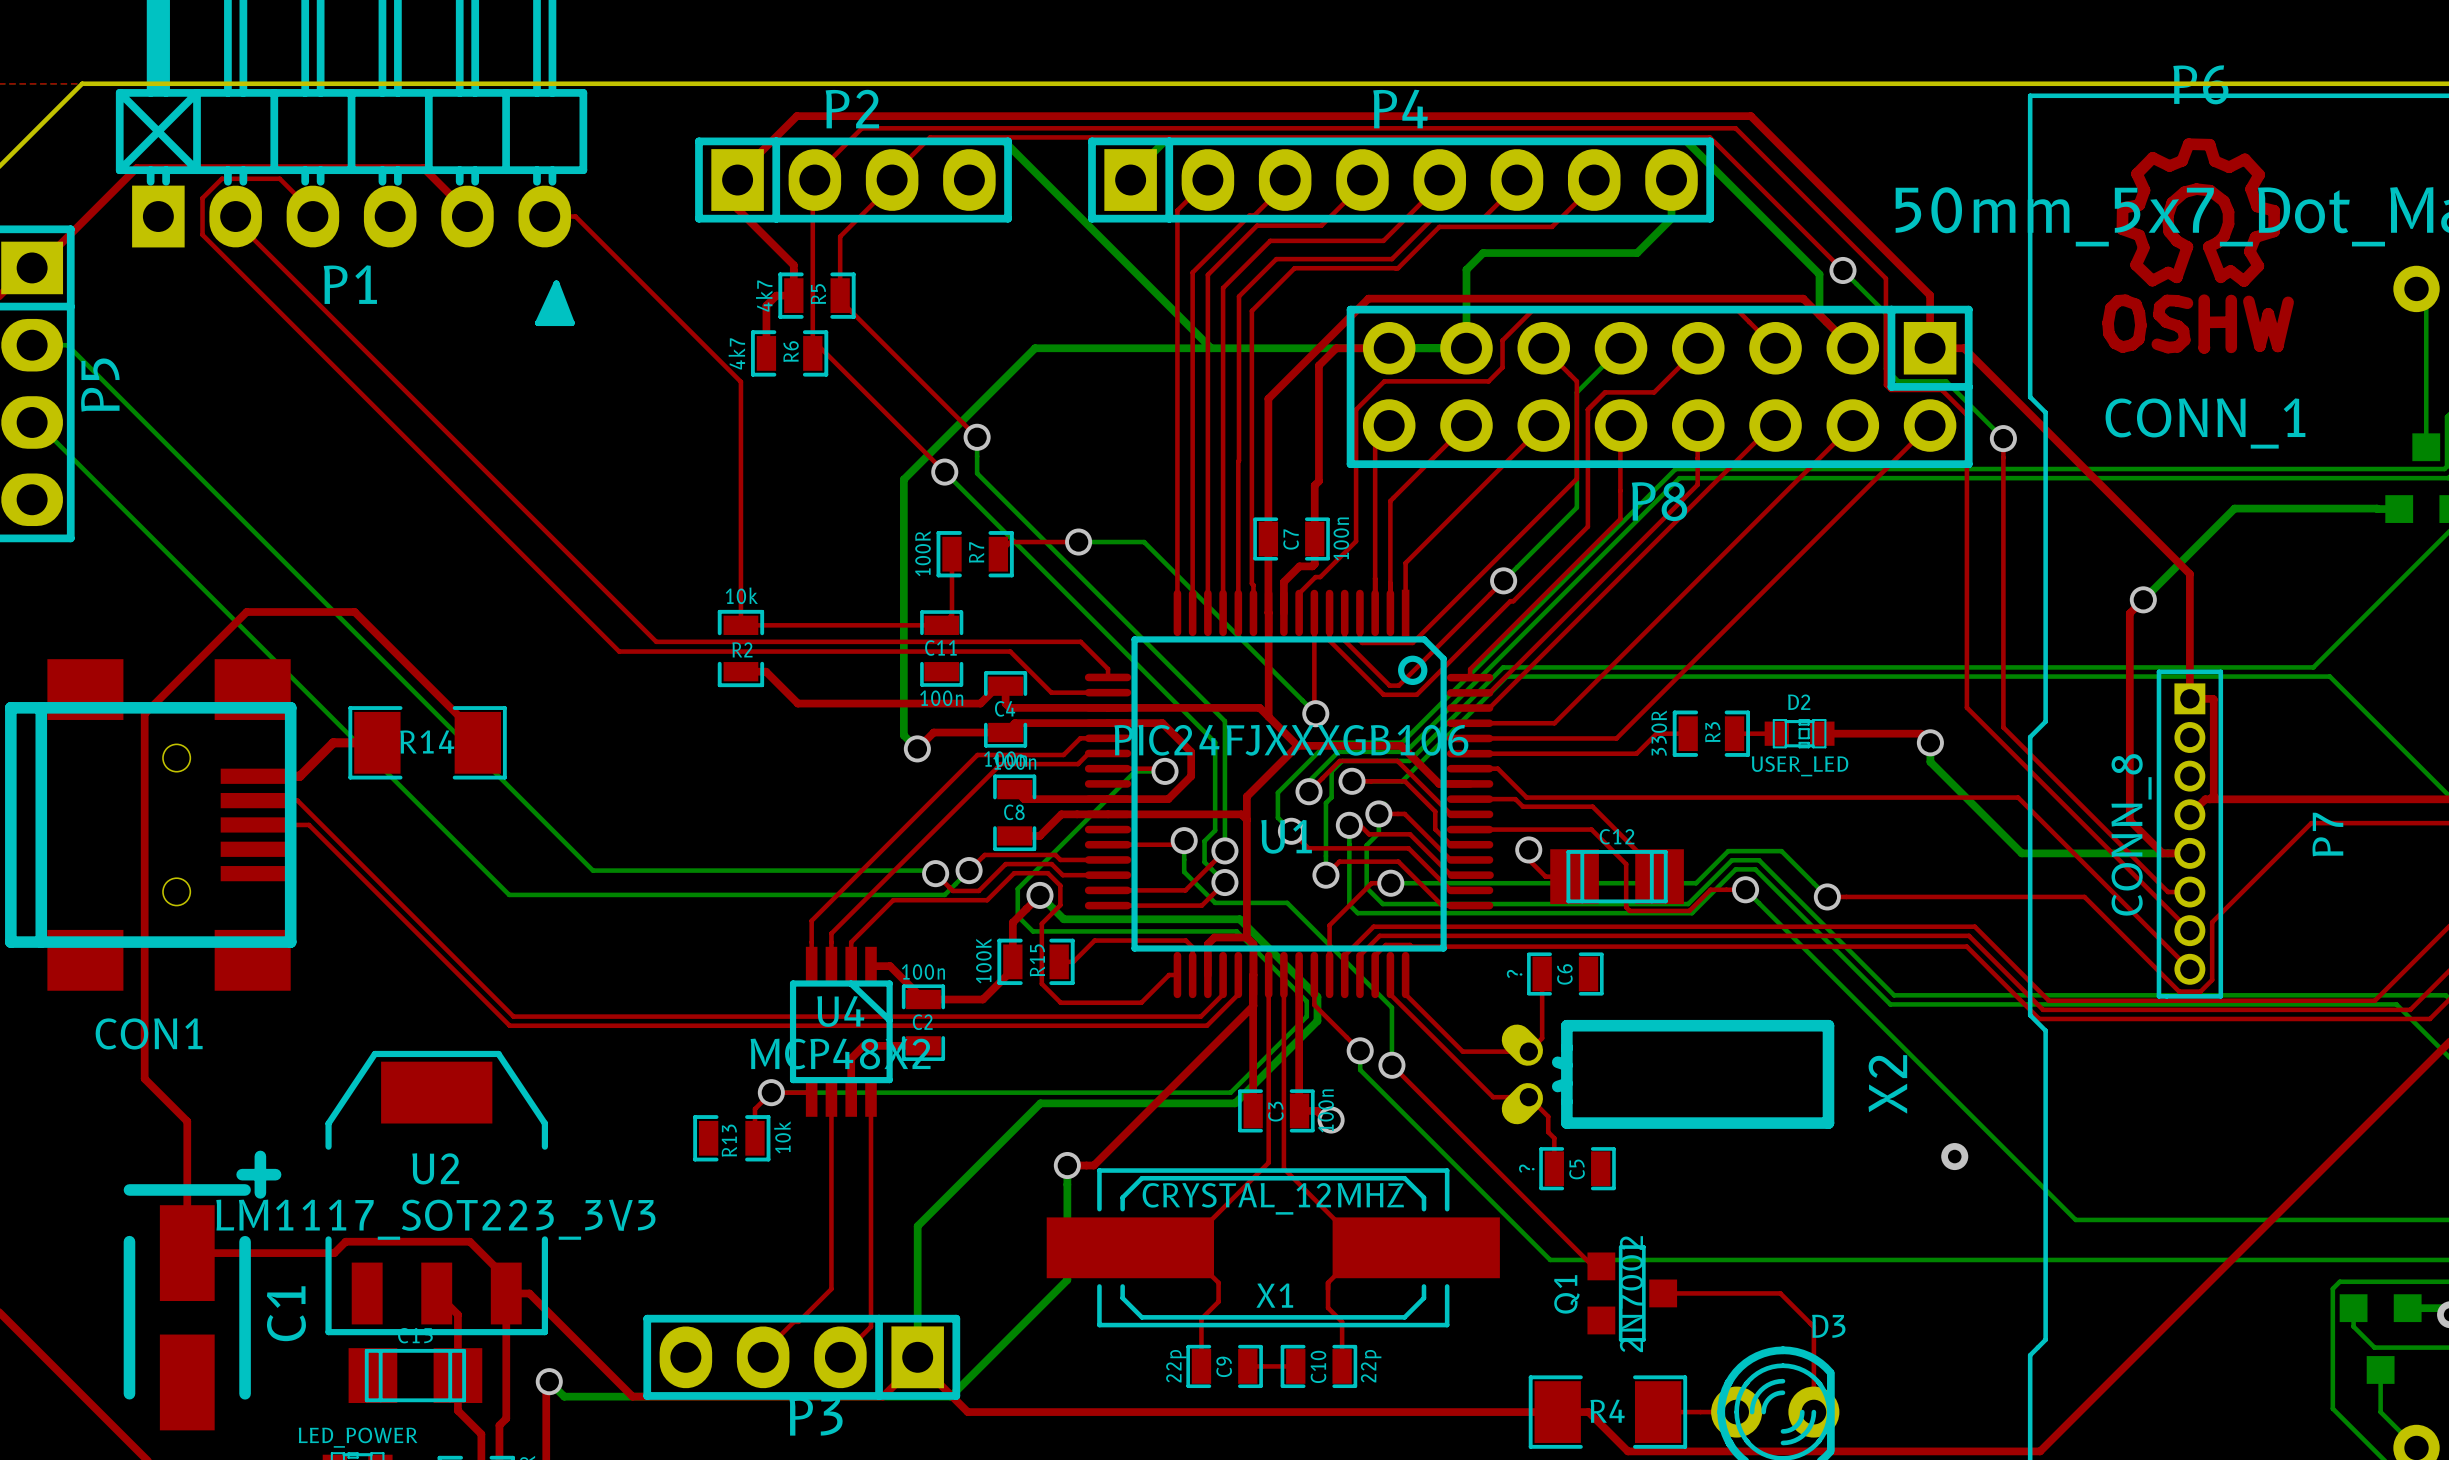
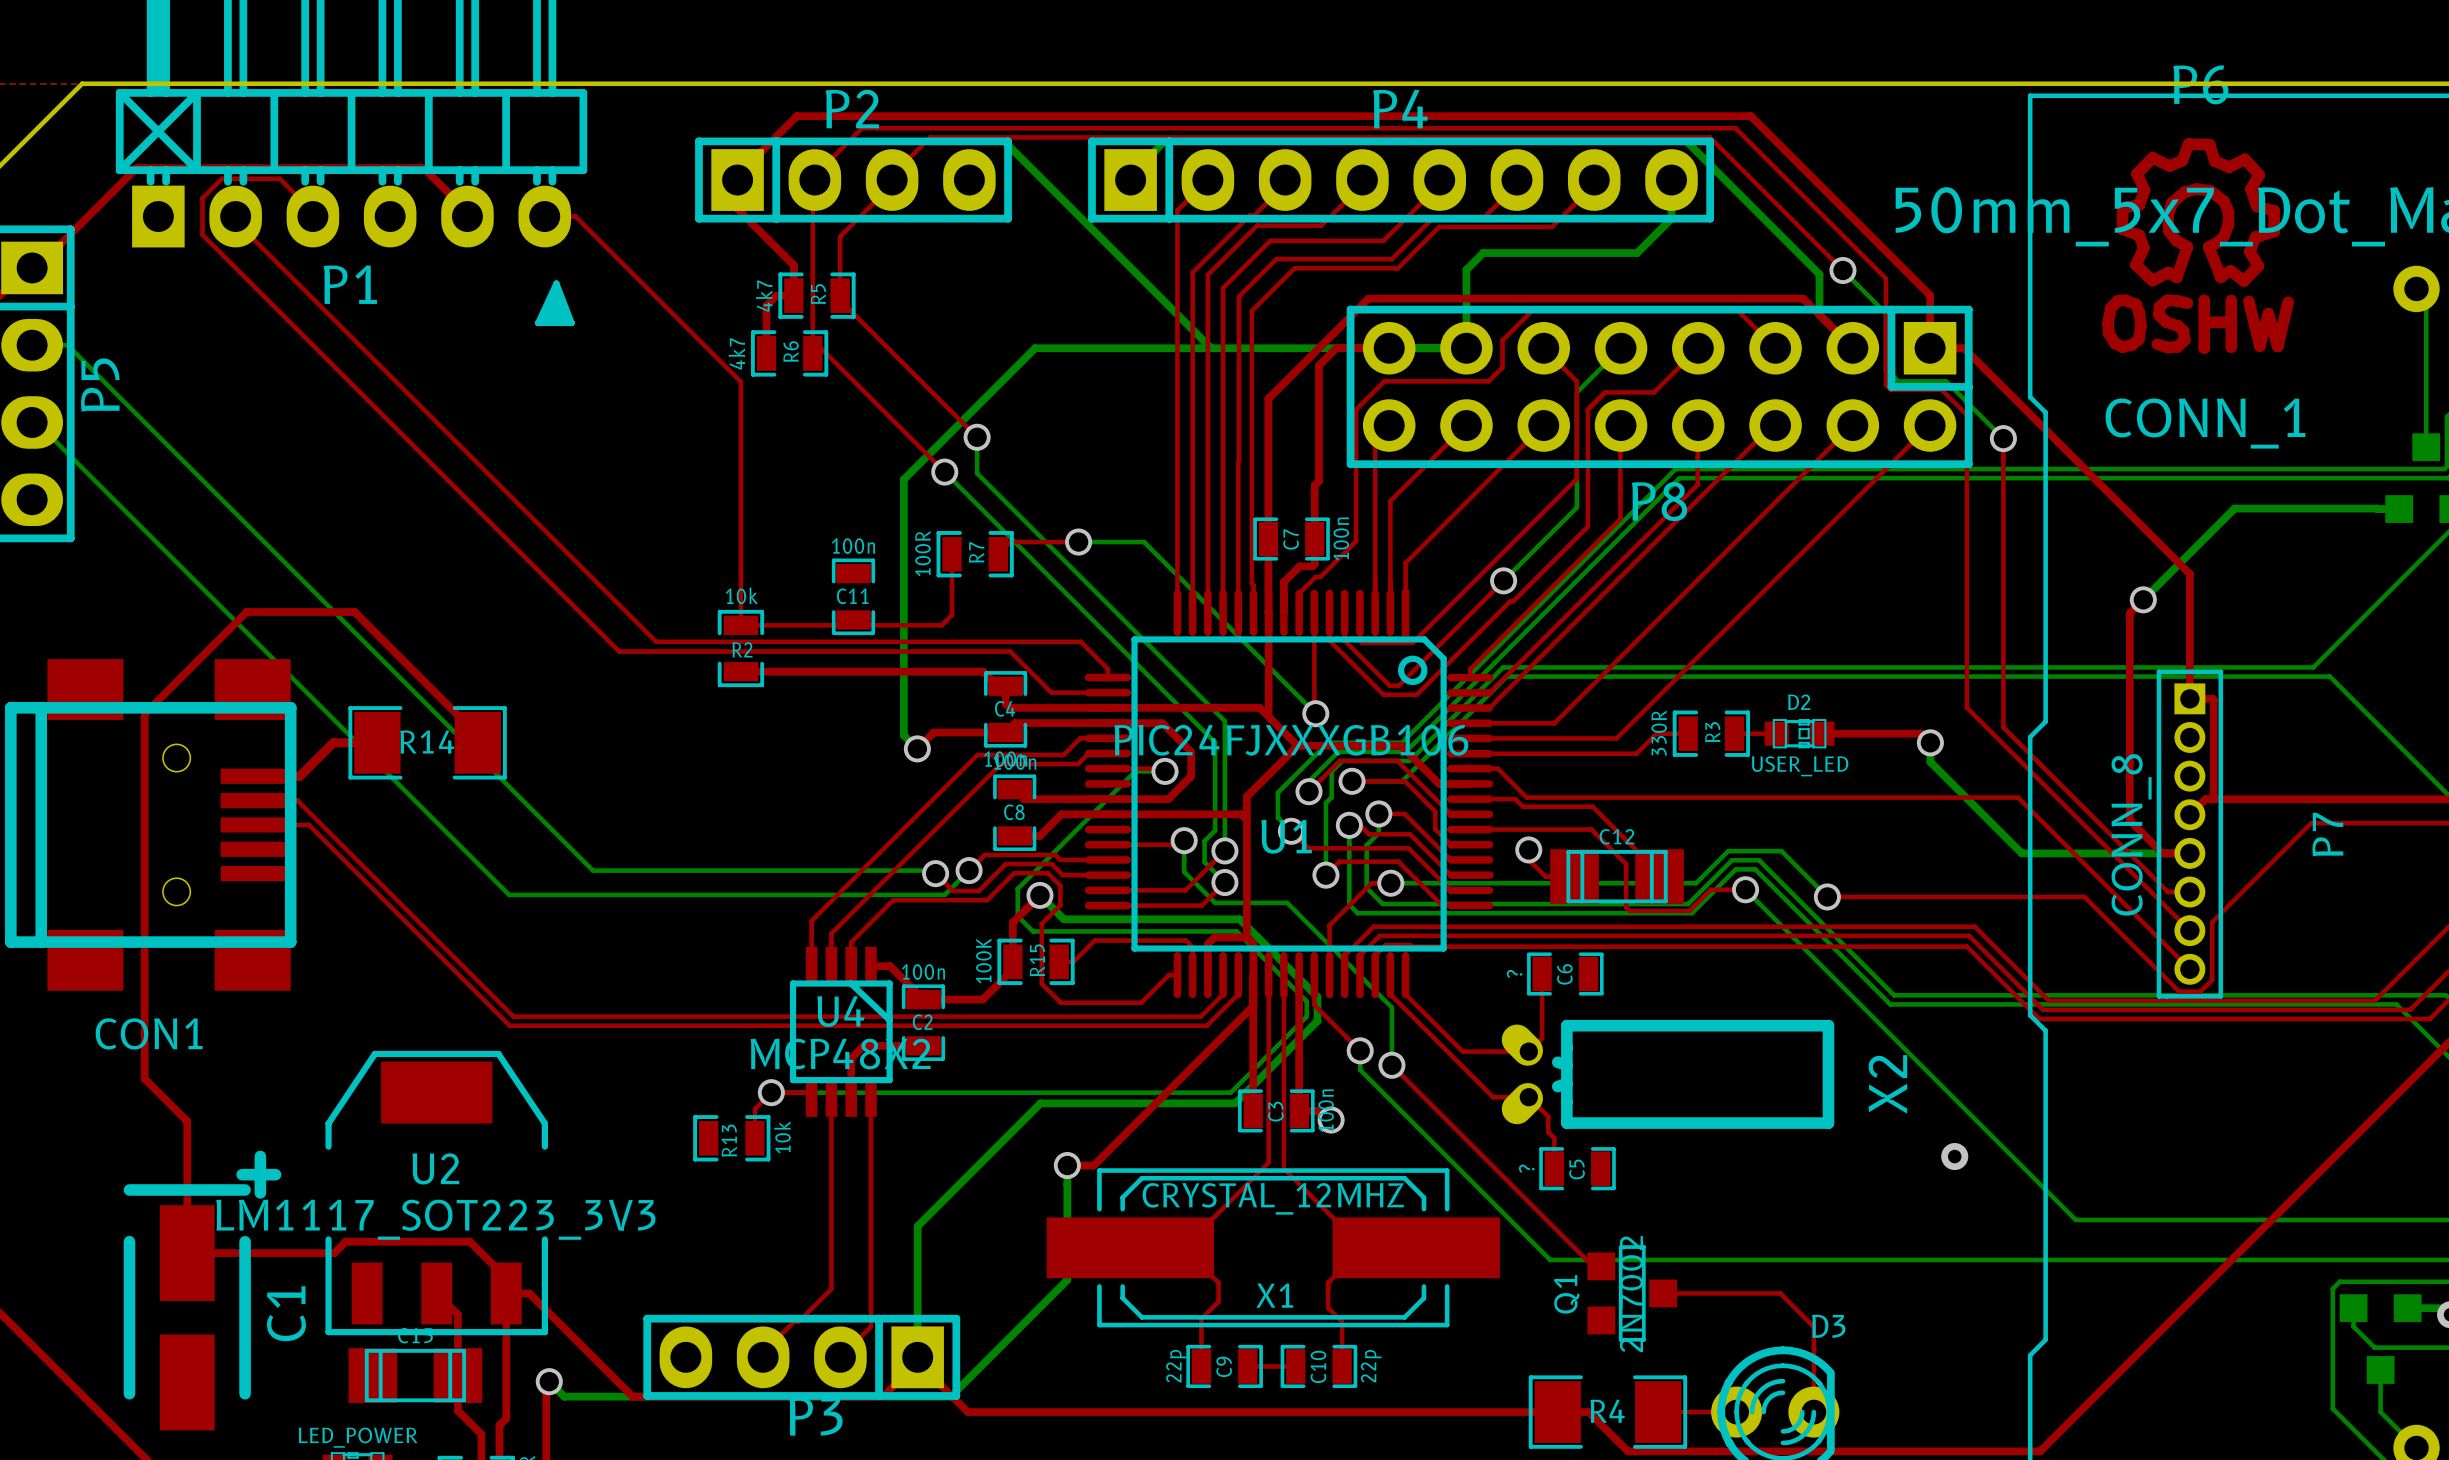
C11 position: (941, 648) -> (853, 596)
top track: (766, 671) (797, 703) (980, 703) (997, 686) -> (766, 671) (983, 671) (997, 686)
C11 value position: 100n (941, 698) -> 100n (853, 546)

